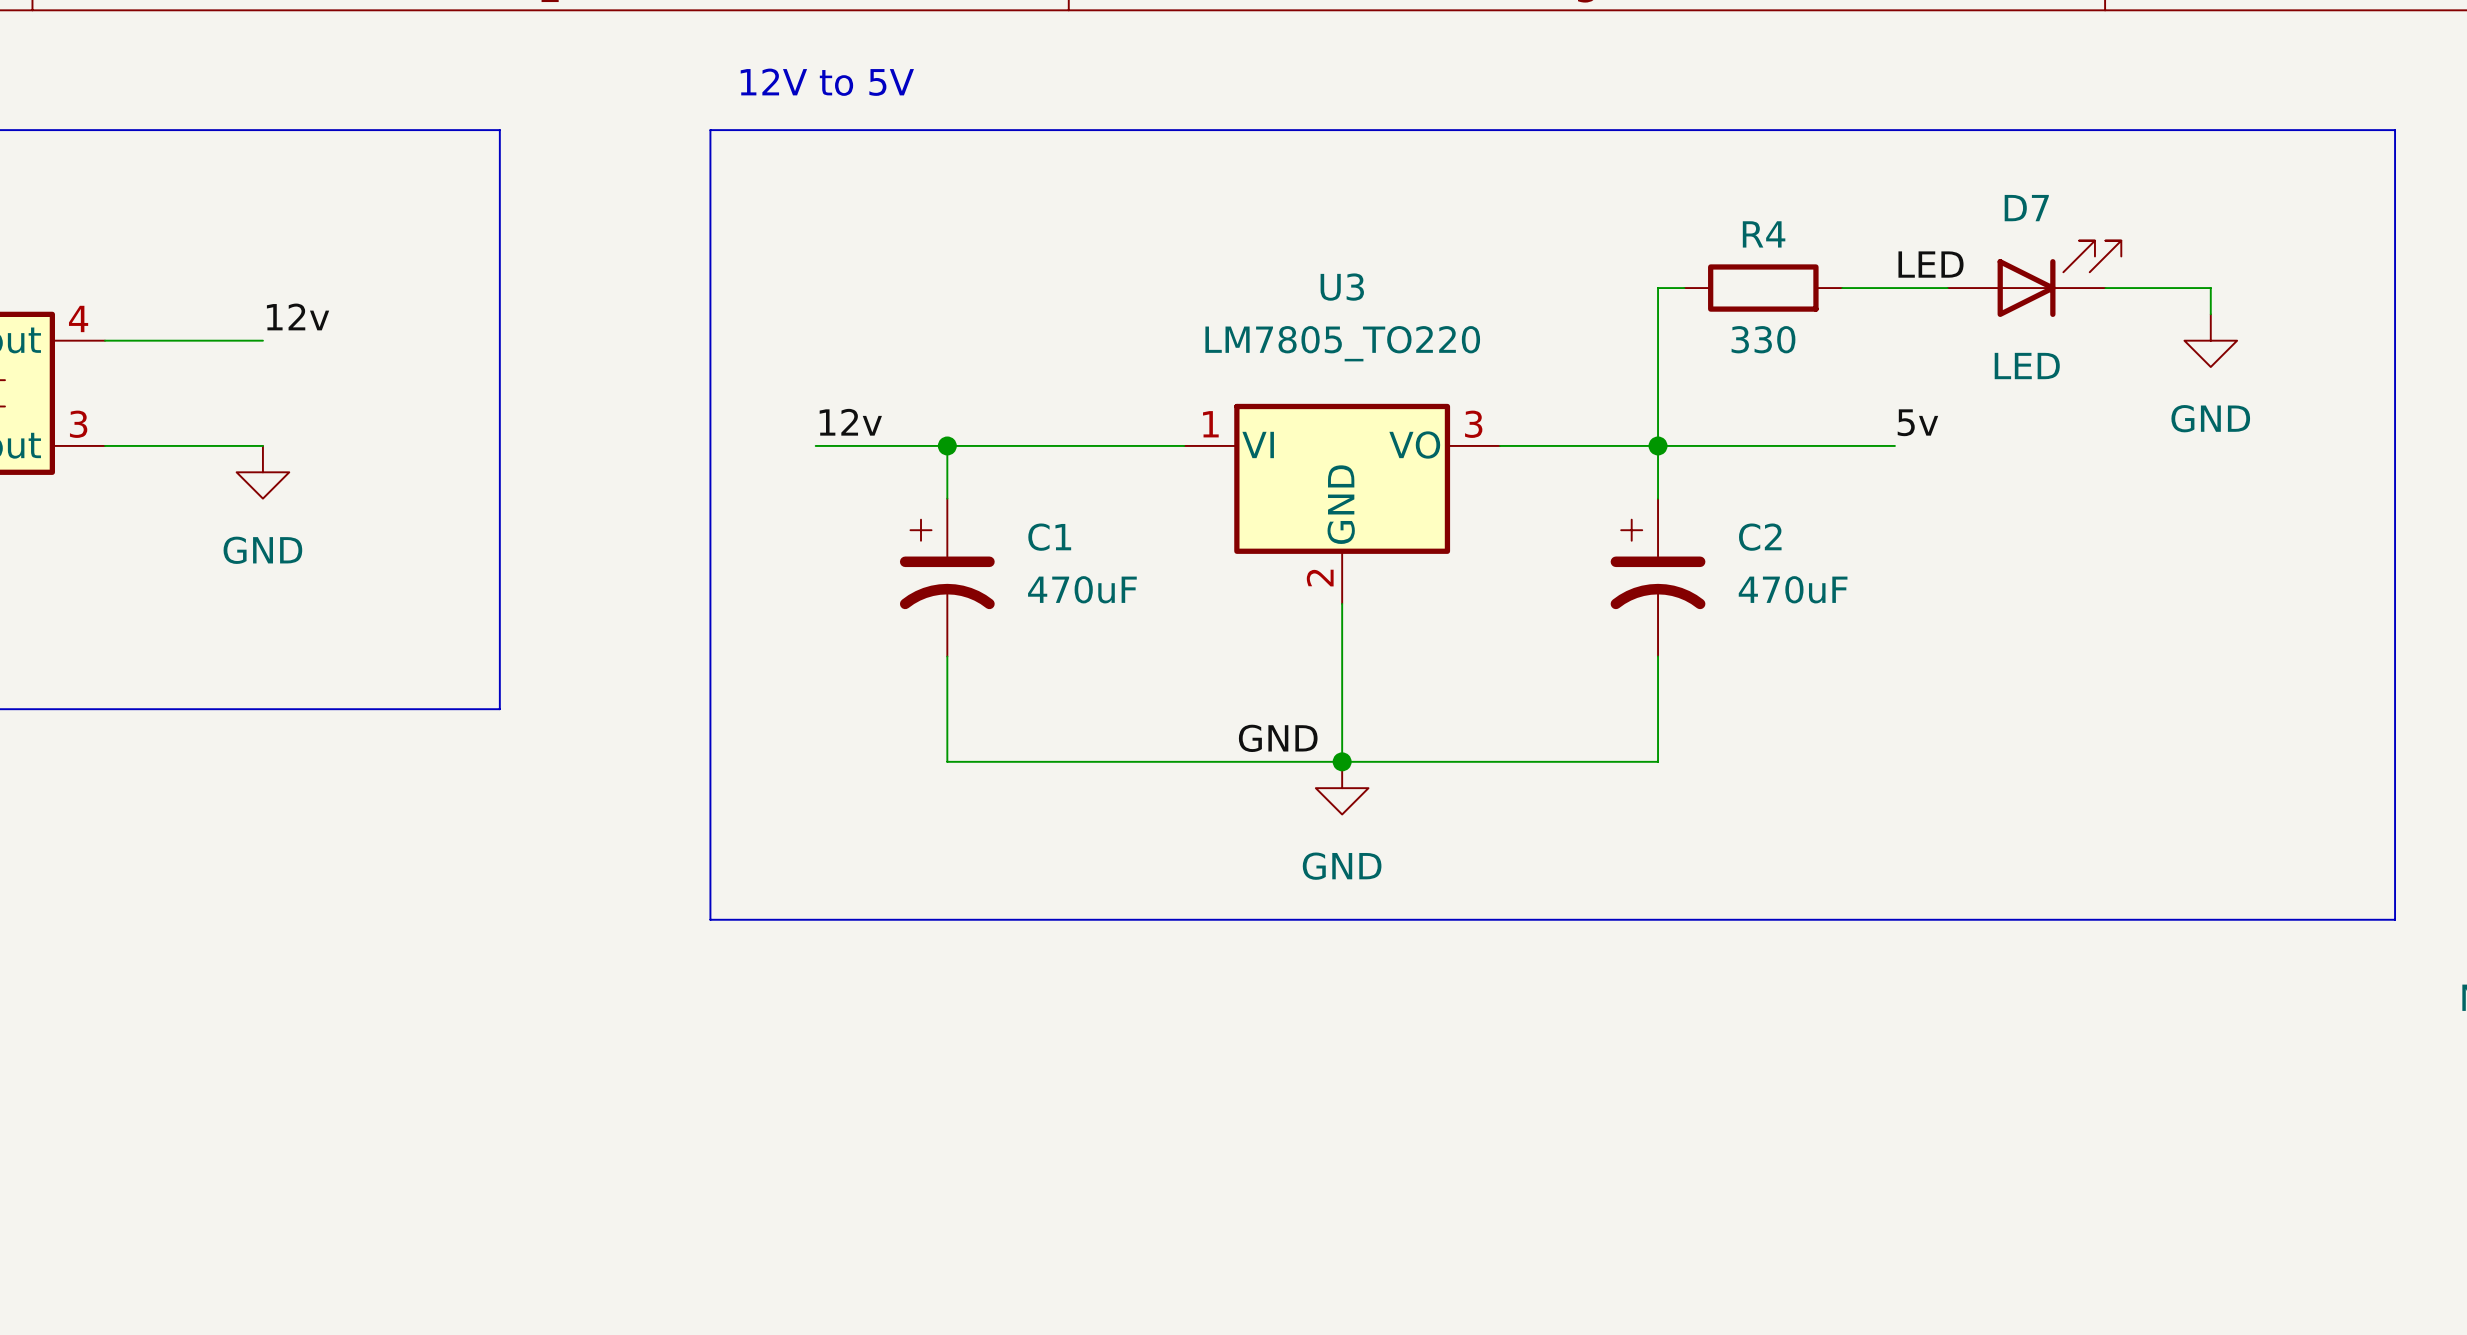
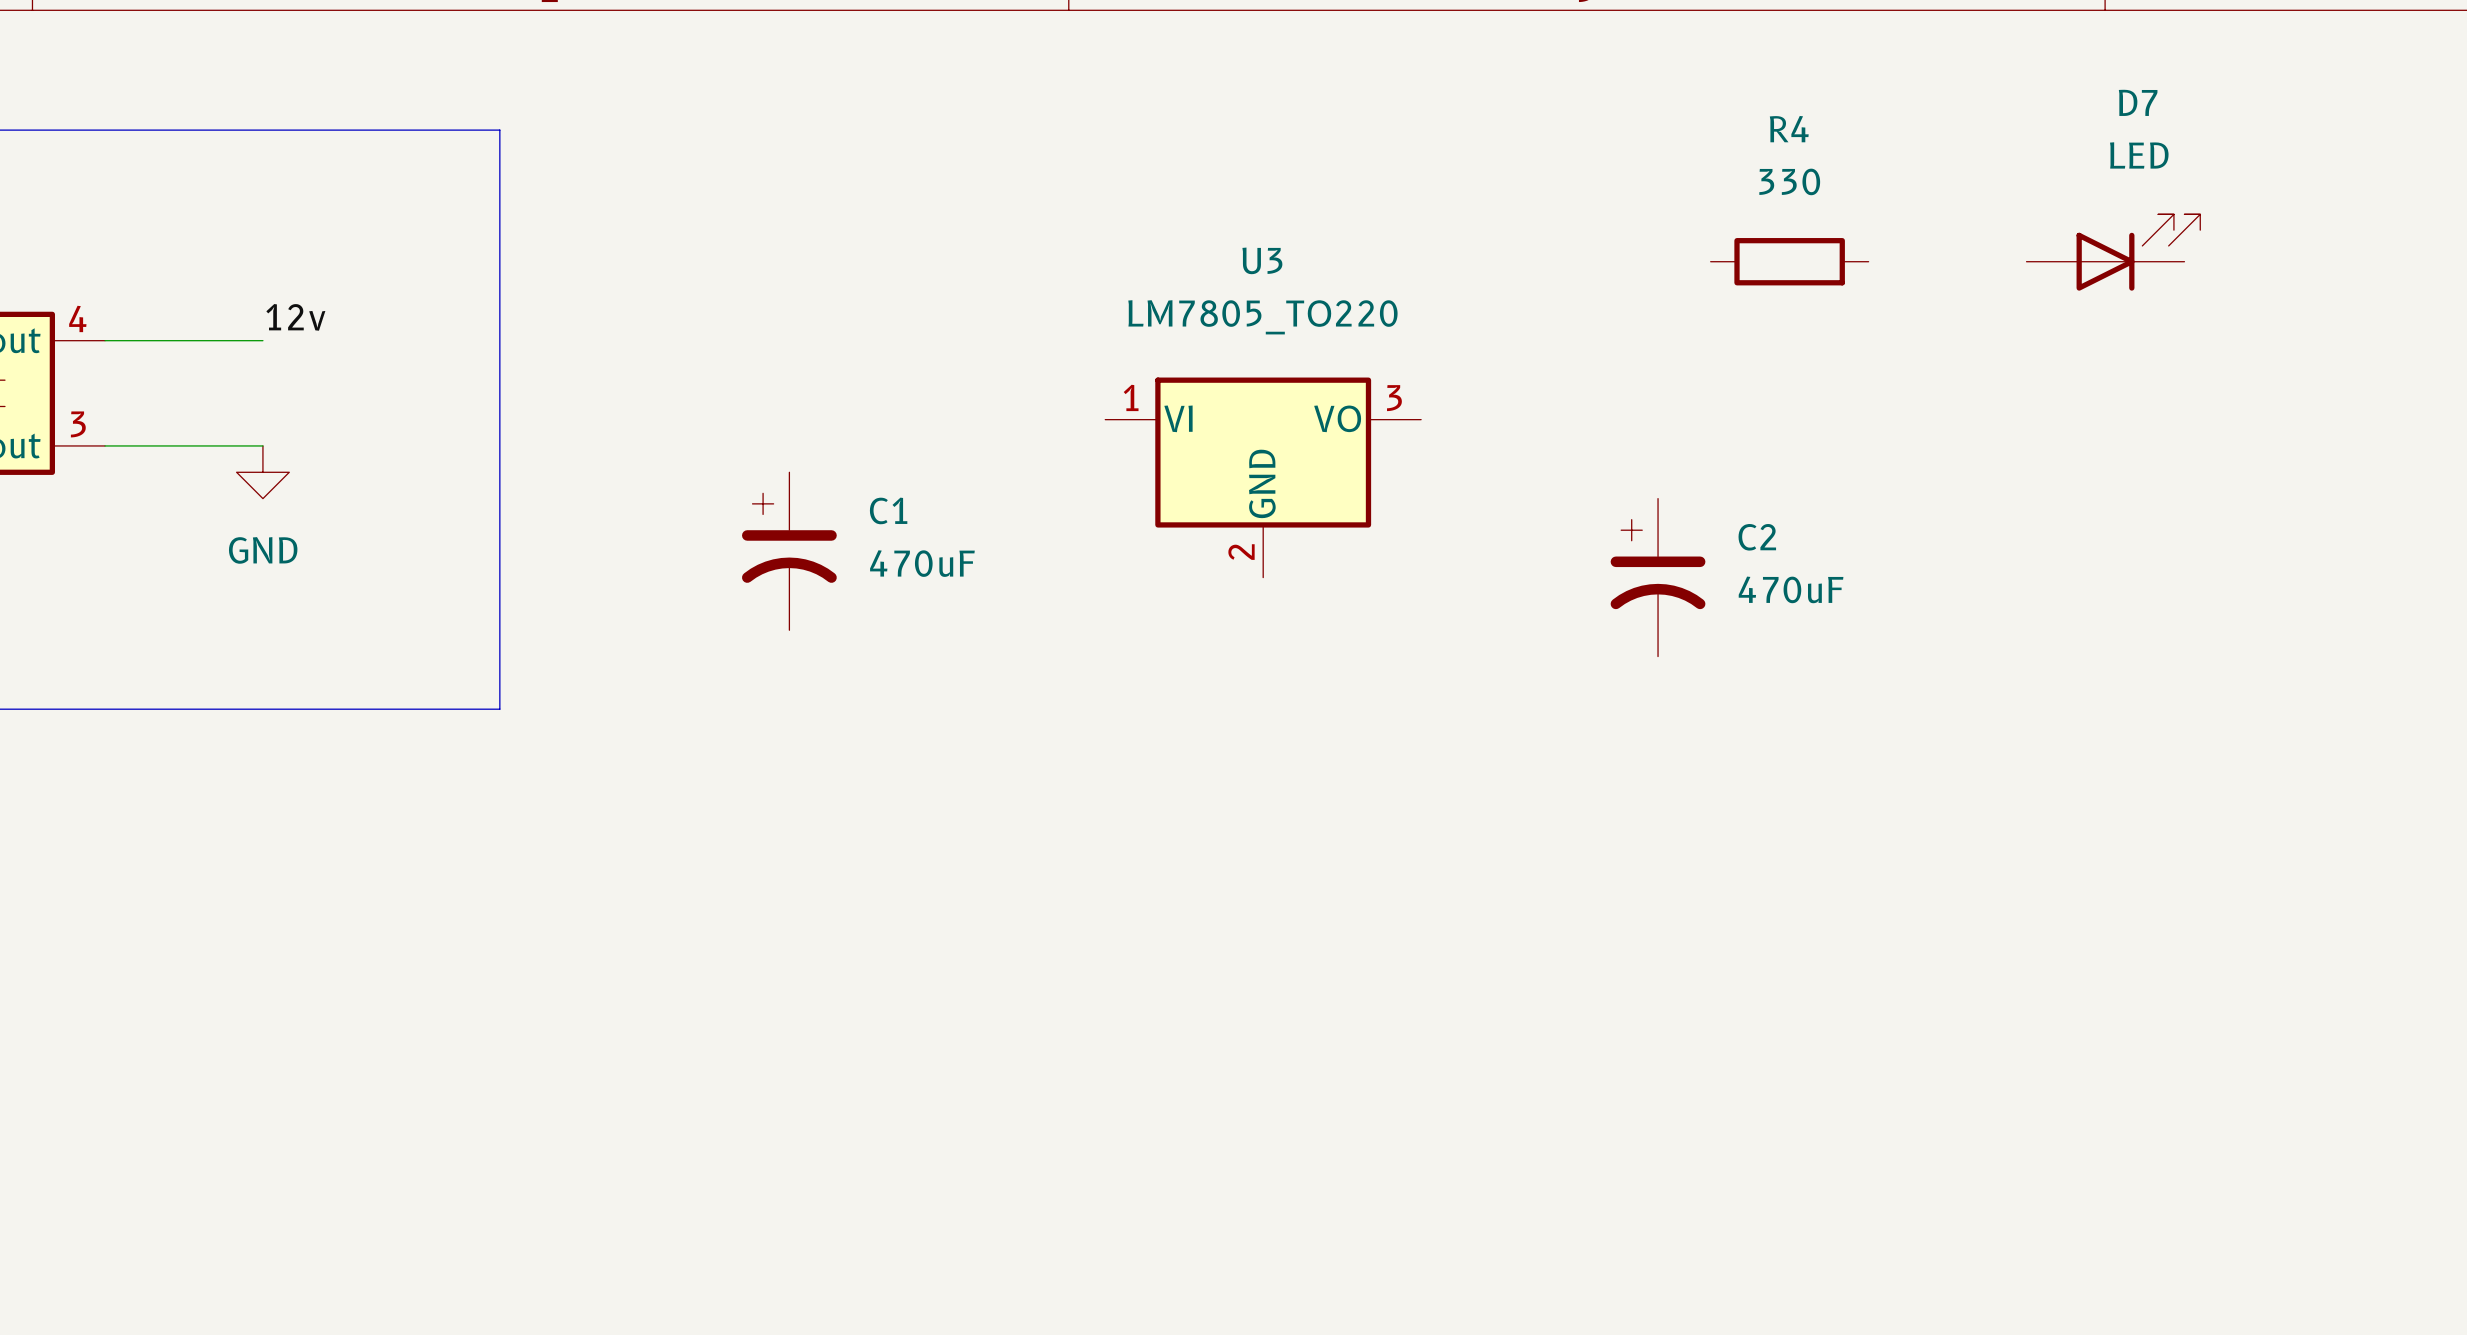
text: 12V to 5V (827, 82) -> none
line: (710, 130) (710, 919) (2395, 919) (2395, 130) (710, 130) -> none
D7 name position: D7 (2026, 208) -> D7 (2138, 102)
R4 name position: R4 (1764, 234) -> R4 (1789, 129)
label: LED (1930, 264) -> none
D7 position: (2034, 278) -> (2113, 252)
wire: (1684, 288) (1658, 288) (1658, 498) -> none
R4 position: (1763, 288) -> (1789, 261)
wire: (1842, 288) (1947, 288) -> none
wire: (2105, 288) (2210, 288) (2210, 314) -> none
R4 value position: 330 (1763, 339) -> 330 (1789, 181)
power symbol: GND (2210, 340) -> none
D7 value position: LED (2027, 366) -> LED (2139, 155)
label: 12v (850, 422) -> none
label: 5v (1917, 422) -> none
wire: (815, 445) (1184, 445) -> none
wire: (947, 445) (947, 498) -> none
junction: (947, 445) -> none
wire: (1500, 445) (1894, 445) -> none
junction: (1658, 445) -> none
U3 position: (1342, 503) -> (1263, 477)
C1 position: (947, 577) -> (789, 551)
wire: (1342, 603) (1342, 761) -> none
wire: (947, 656) (947, 761) (1658, 761) (1658, 656) -> none
label: GND (1278, 738) -> none
junction: (1342, 761) -> none
power symbol: GND (1342, 788) -> none

